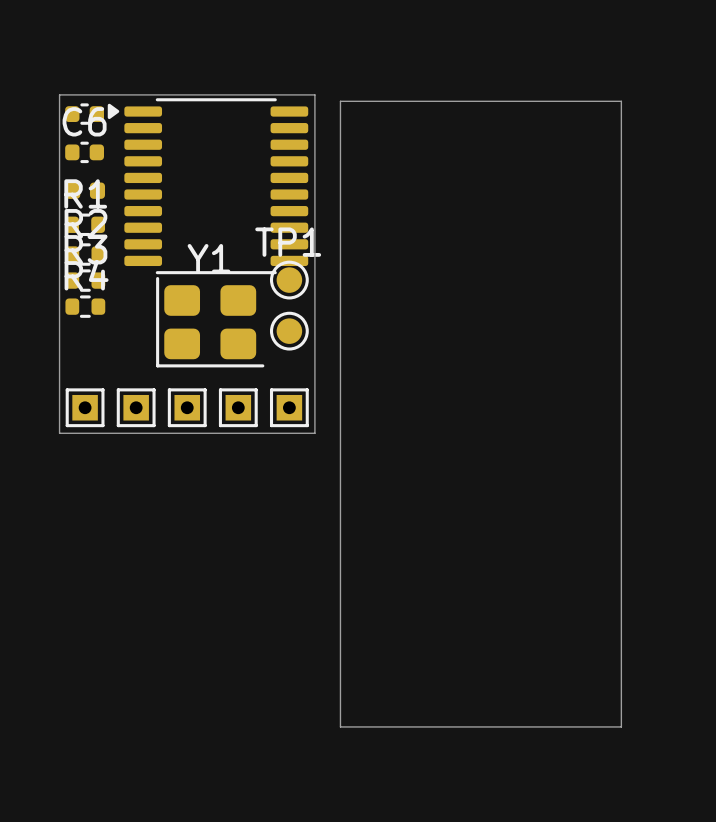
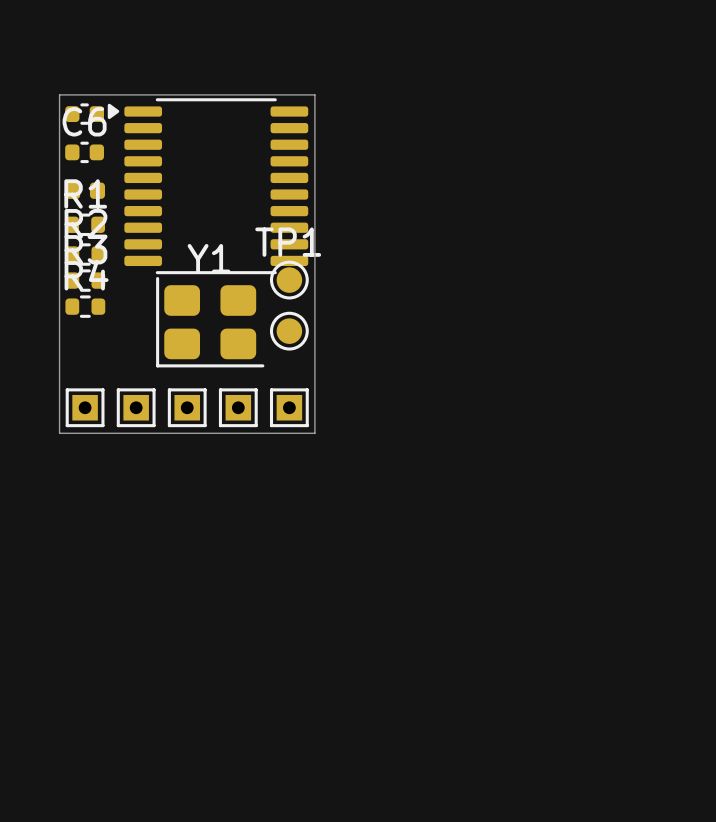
board edge: (340, 101) (621, 101) (621, 726) (340, 726) (340, 101) -> none

